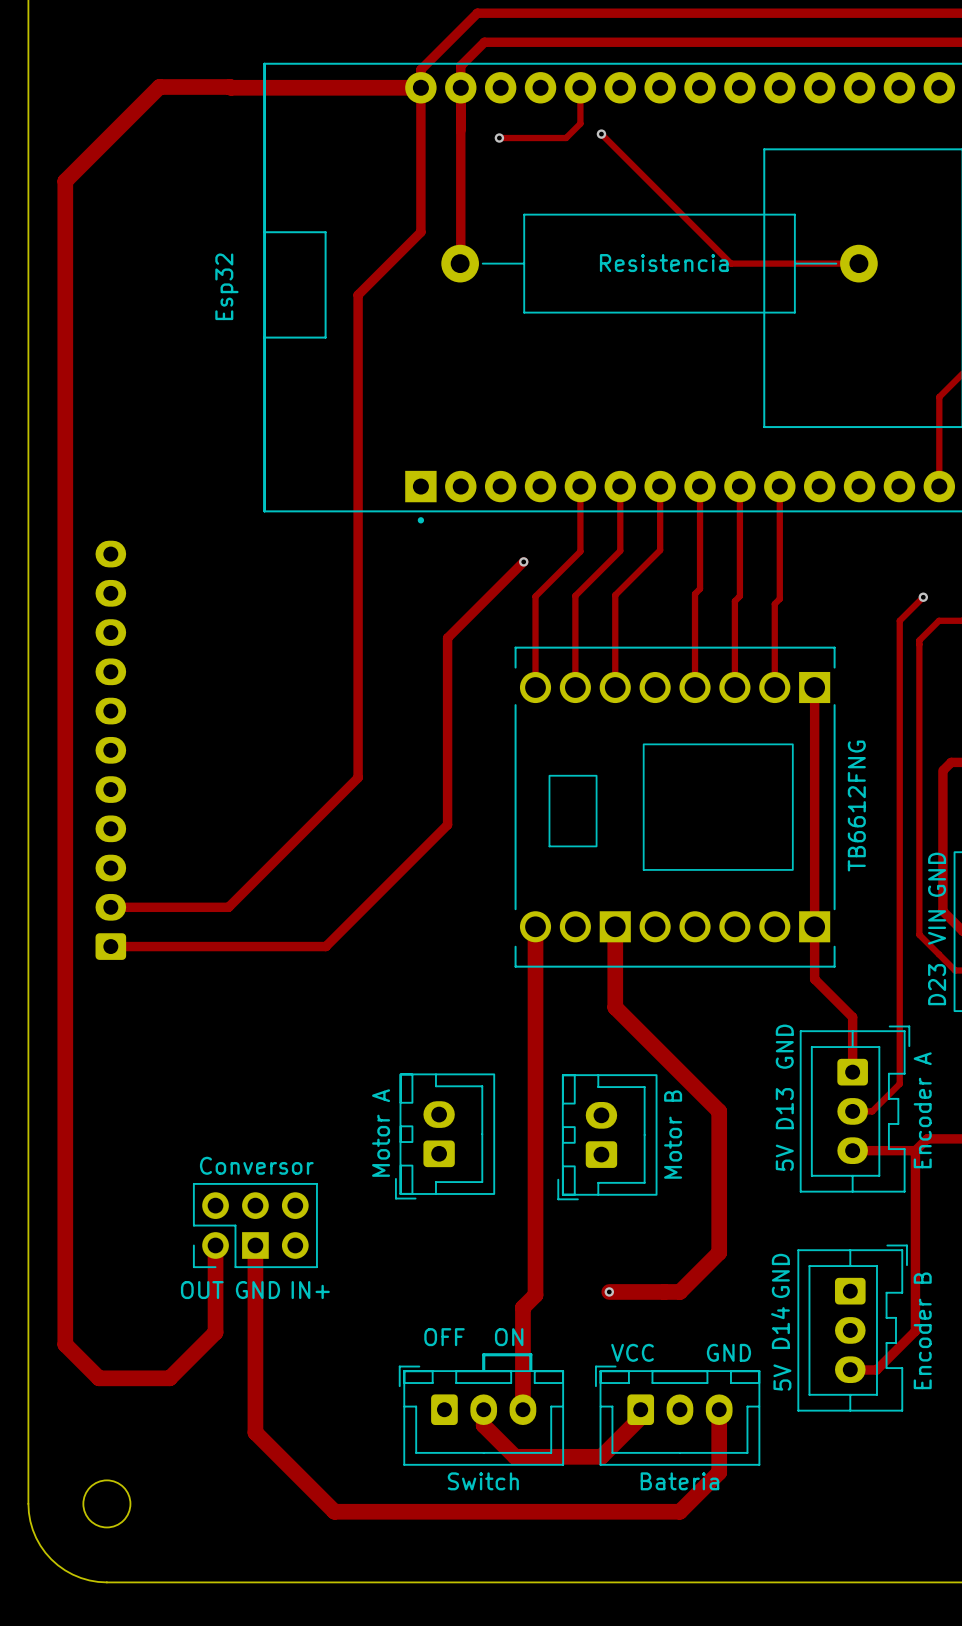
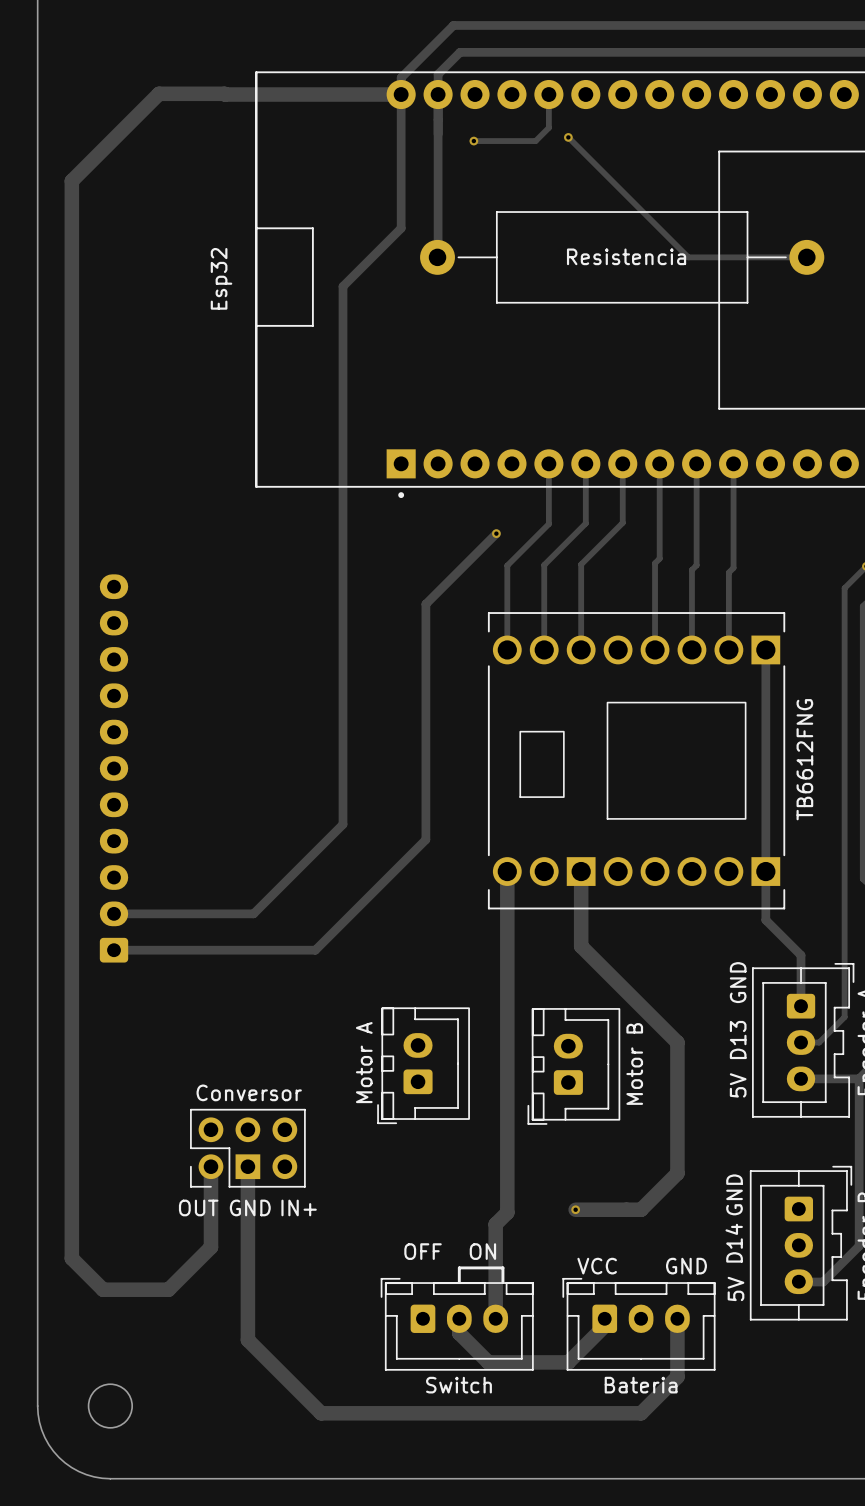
part position: (110, 750) -> (114, 768)
track: (358, 777) (228, 907) (110, 907) -> (343, 733) (343, 824) (253, 913) (114, 913)
track: (447, 824) (325, 946) (110, 946) -> (425, 777) (425, 839) (315, 950) (114, 950)

